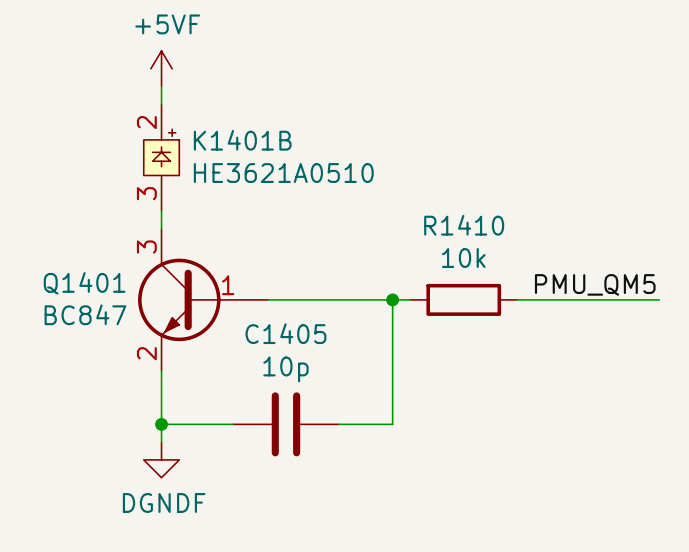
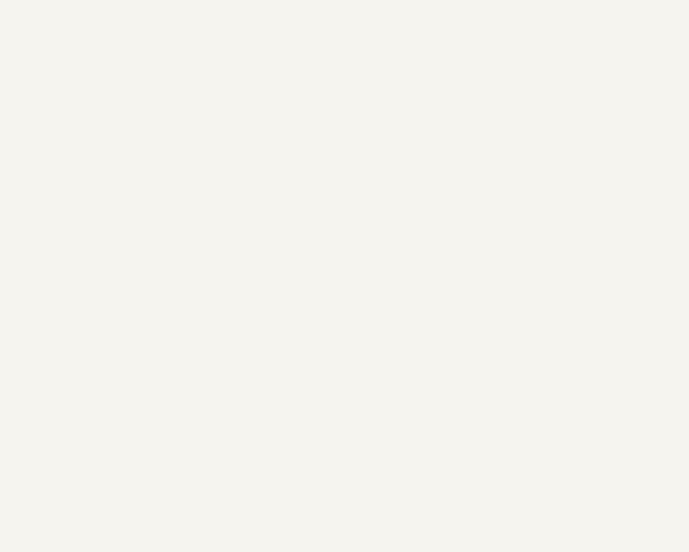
power symbol: +5VF (161, 68) -> none
wire: (161, 86) (161, 104) -> none
K1401B: HE3621A0510 (161, 157) -> none
wire: (161, 211) (161, 228) -> none
label: PMU_QM5 (595, 284) -> none
Q1401: BC847 (203, 299) -> none
wire: (268, 299) (410, 299) -> none
wire: (392, 299) (392, 424) (339, 424) -> none
junction: (392, 299) -> none
R1410: 10k (463, 299) -> none
wire: (517, 299) (659, 299) -> none
wire: (161, 371) (161, 442) -> none
wire: (161, 424) (232, 424) -> none
junction: (161, 424) -> none
C1405: 10p (285, 424) -> none
power symbol: DGNDF (161, 459) -> none

